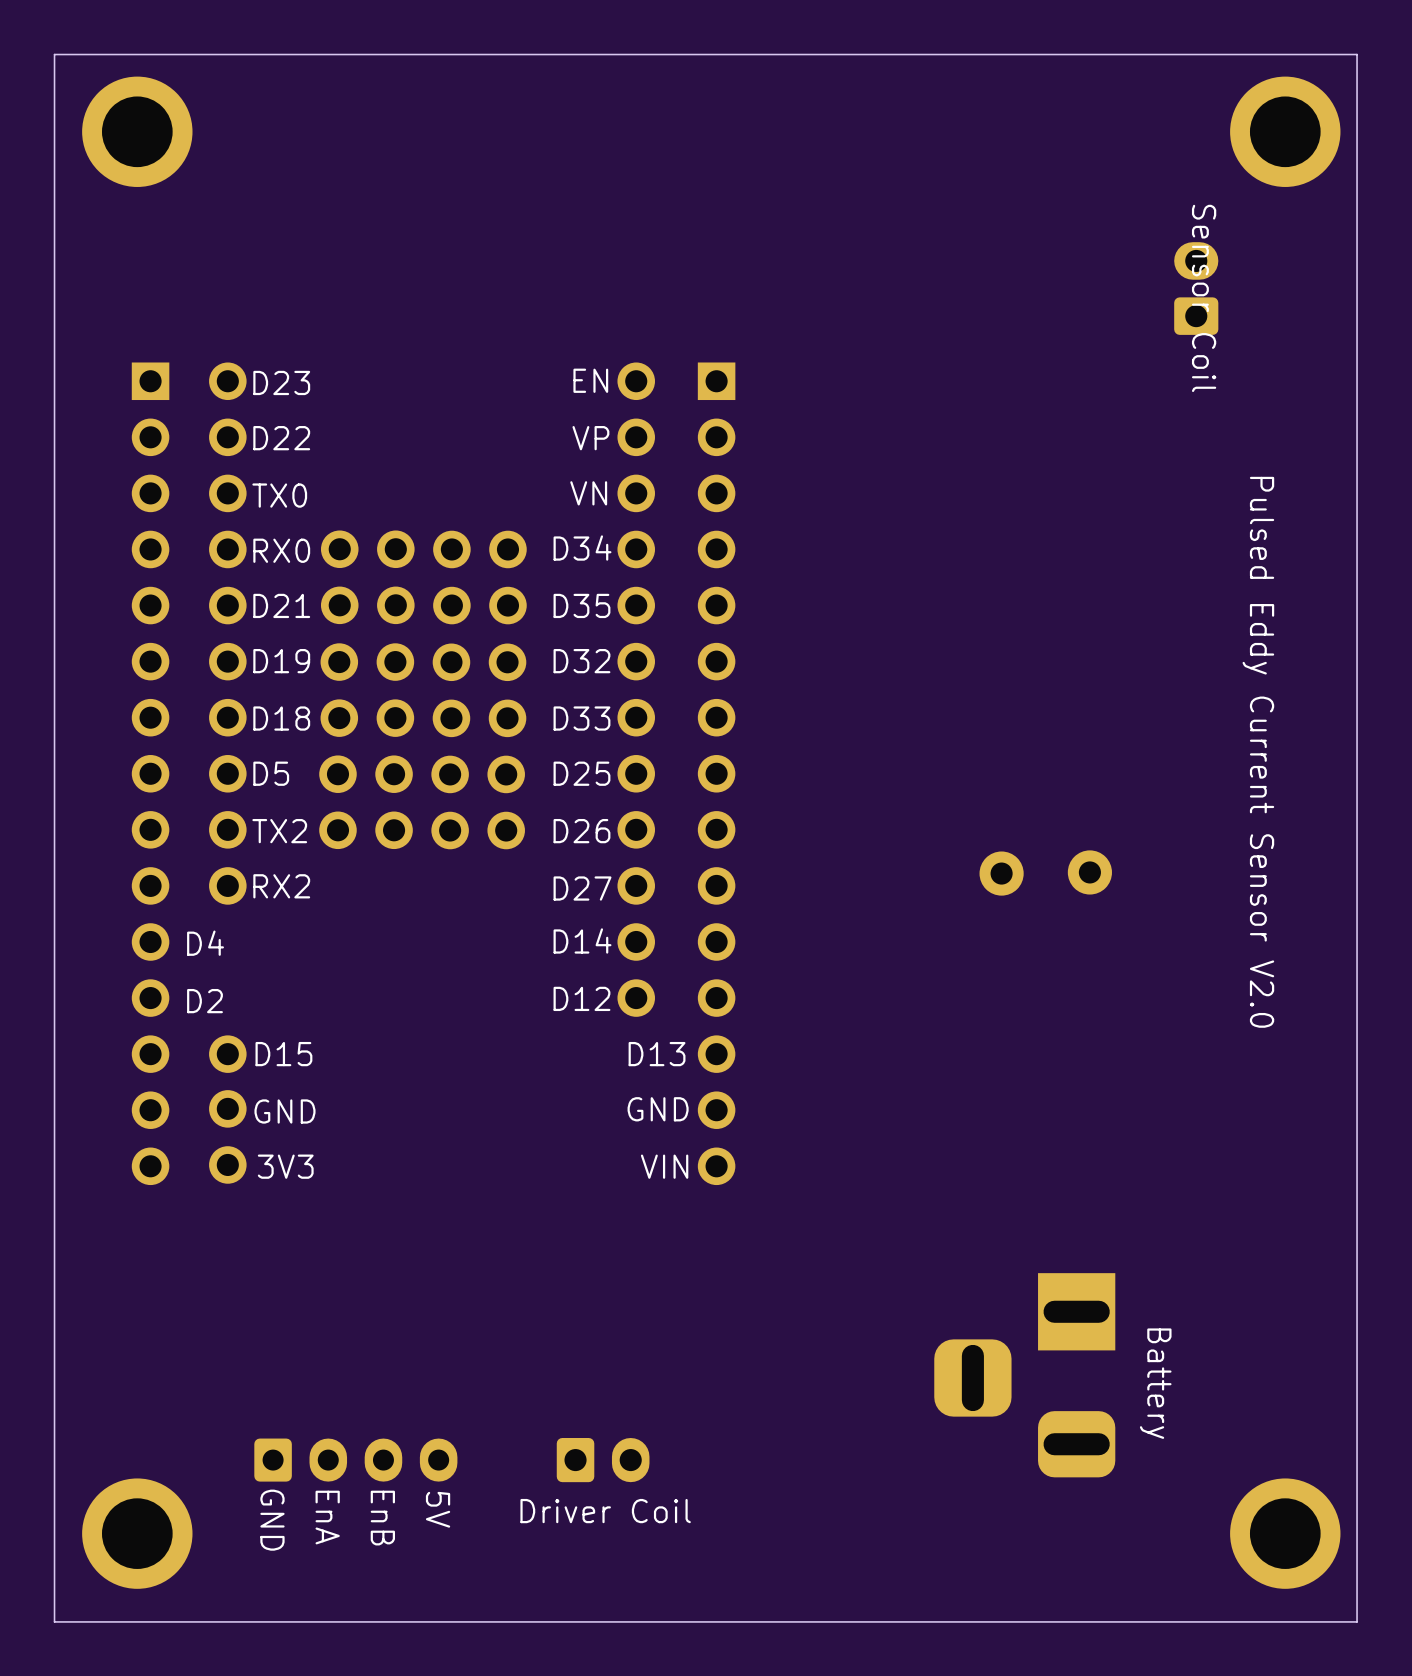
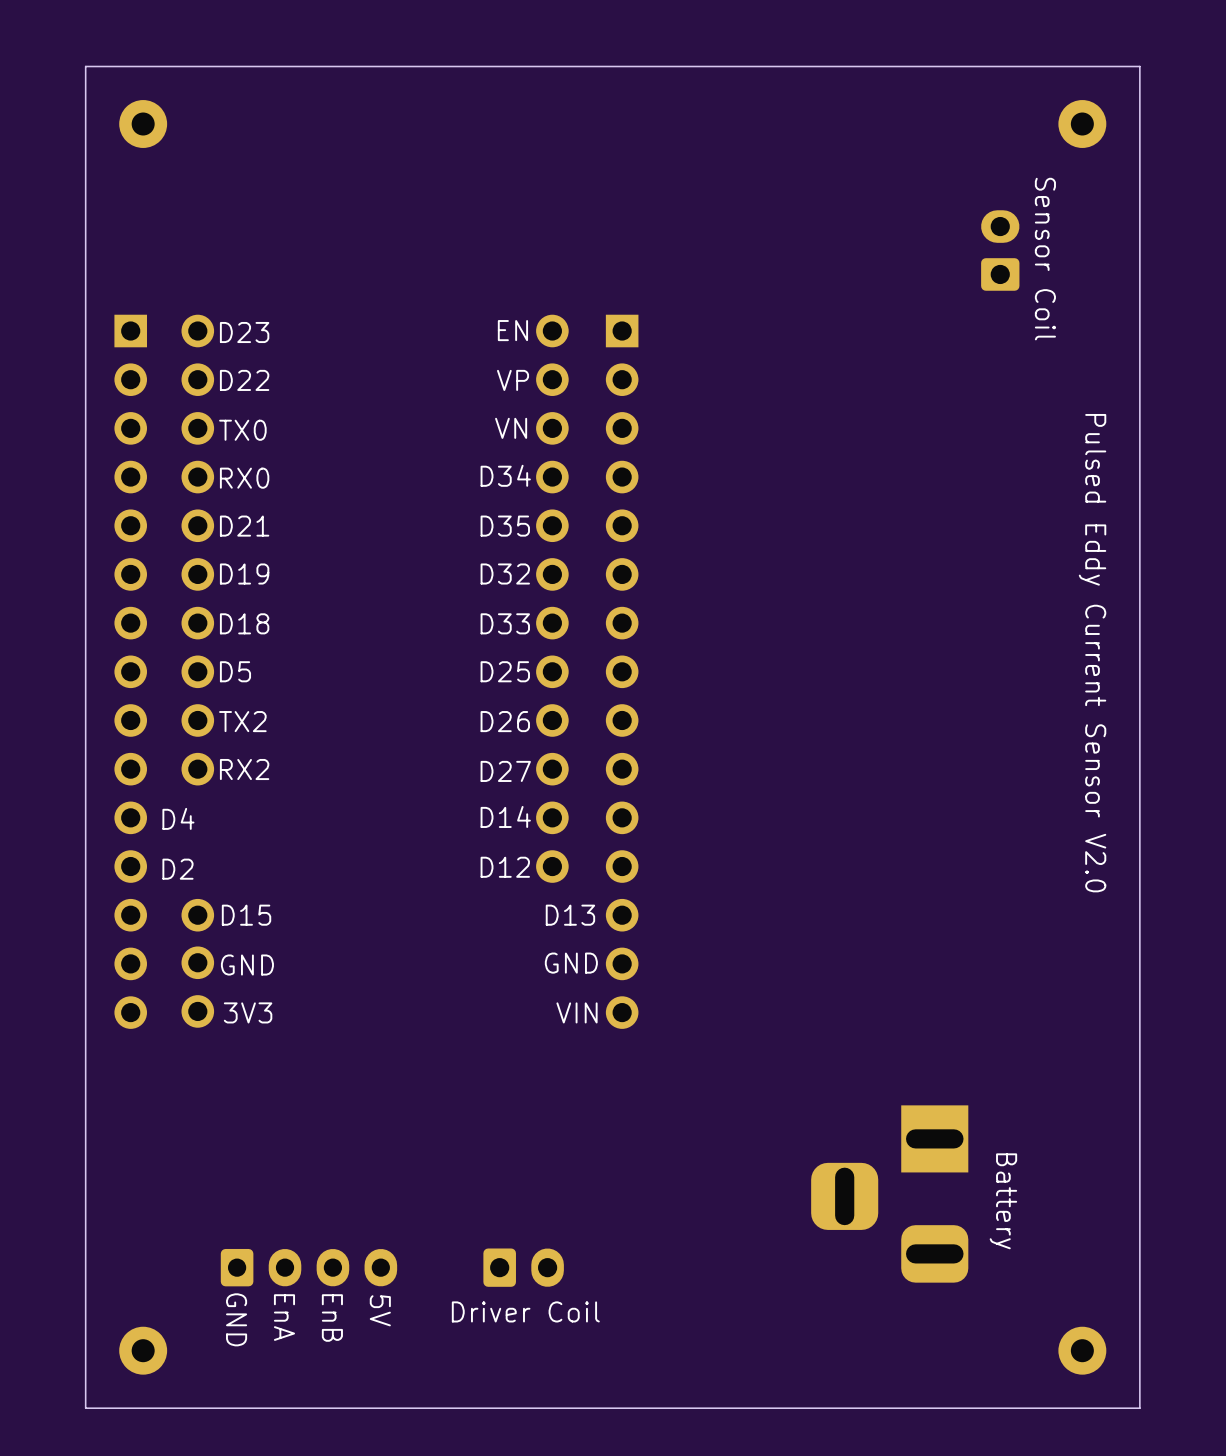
part: (137, 131) -> none
part: (1285, 131) -> none
part: none -> (143, 124)
part: none -> (1082, 124)
part position: (1196, 288) -> (1000, 250)
part: (339, 549) -> none
part: (395, 549) -> none
part: (451, 549) -> none
part: (507, 549) -> none
part: (339, 605) -> none
part: (395, 605) -> none
part: (451, 605) -> none
part: (507, 605) -> none
part: (339, 662) -> none
part: (395, 662) -> none
part: (451, 662) -> none
part: (507, 662) -> none
part: (339, 718) -> none
part: (395, 718) -> none
part: (451, 718) -> none
part: (507, 718) -> none
part: (337, 774) -> none
part: (394, 774) -> none
part: (450, 774) -> none
part: (506, 774) -> none
part: (337, 830) -> none
part: (394, 830) -> none
part: (450, 830) -> none
part: (506, 830) -> none
part: (1089, 872) -> none
part: (1001, 873) -> none
part: (137, 1533) -> none
part: (1285, 1533) -> none
part: none -> (143, 1350)
part: none -> (1082, 1350)
board edge: (1312, 1621) (1357, 1621) (1357, 54) (54, 54) (54, 1621) (98, 1621) -> (1139, 1408) (1139, 66) (85, 66) (85, 1408)

